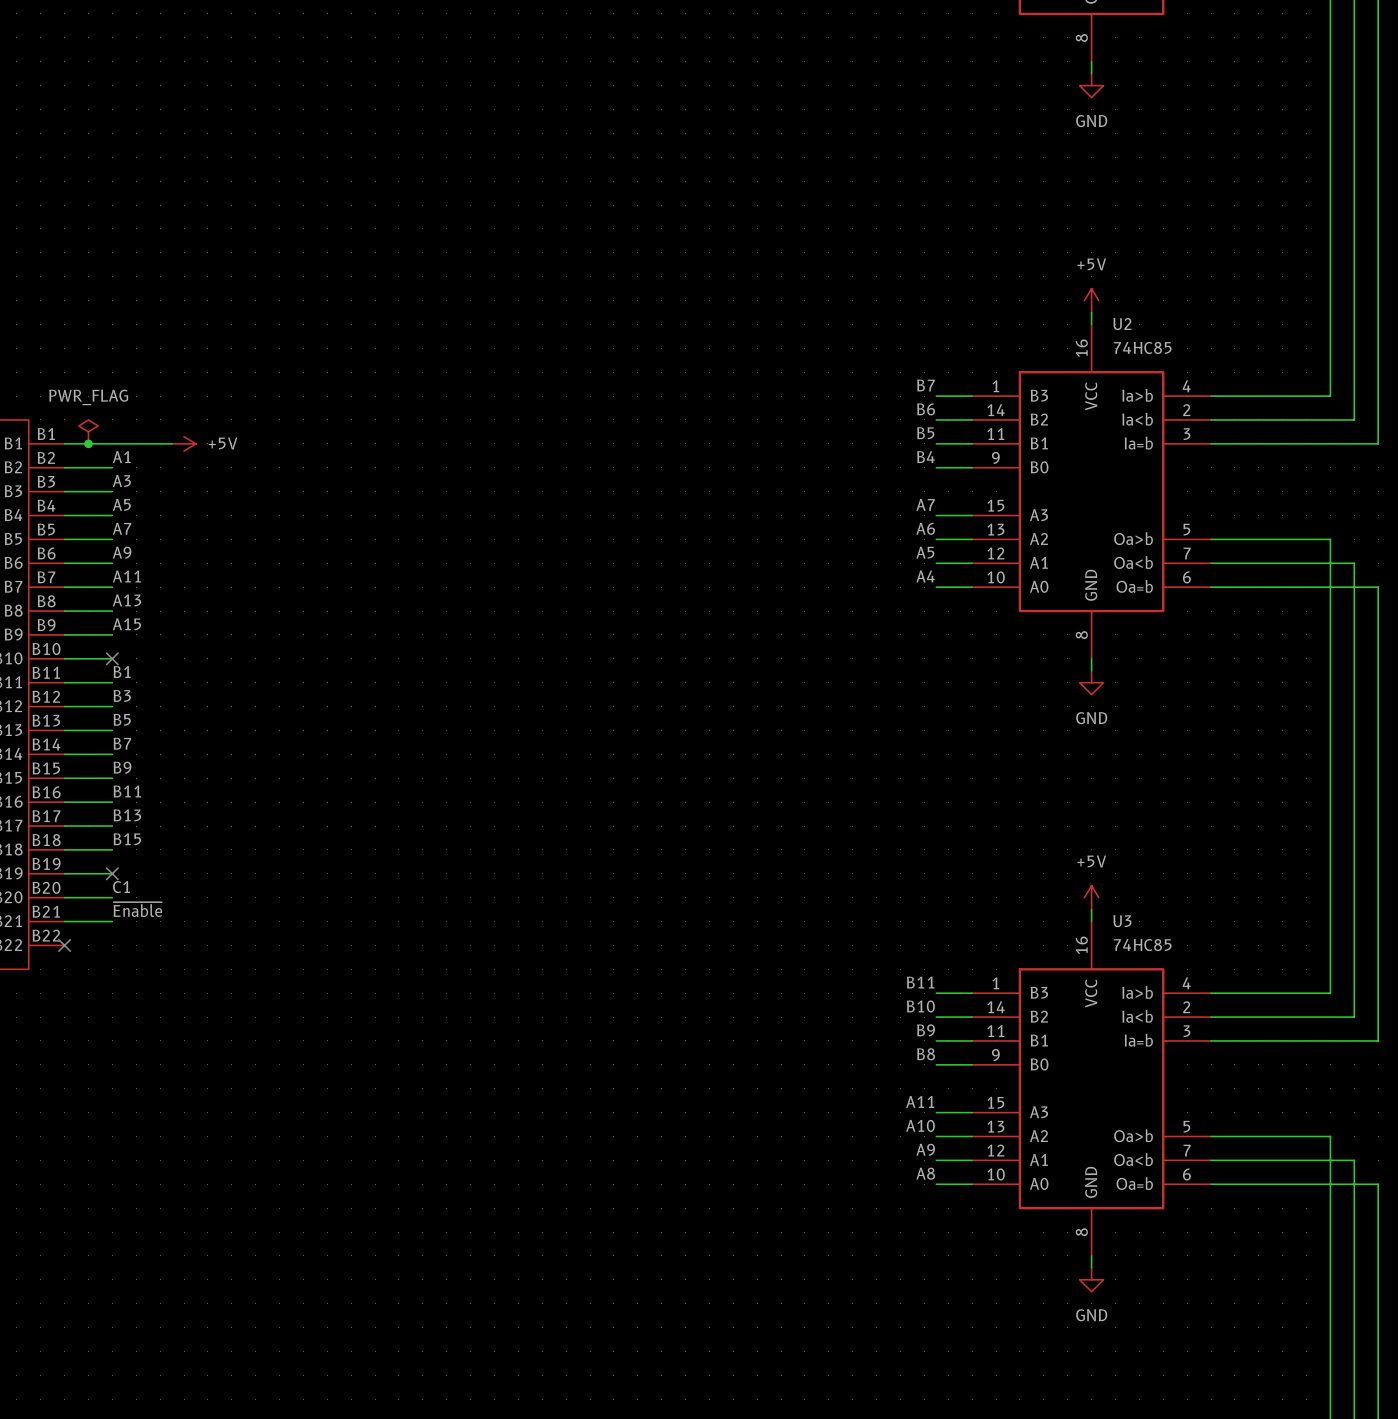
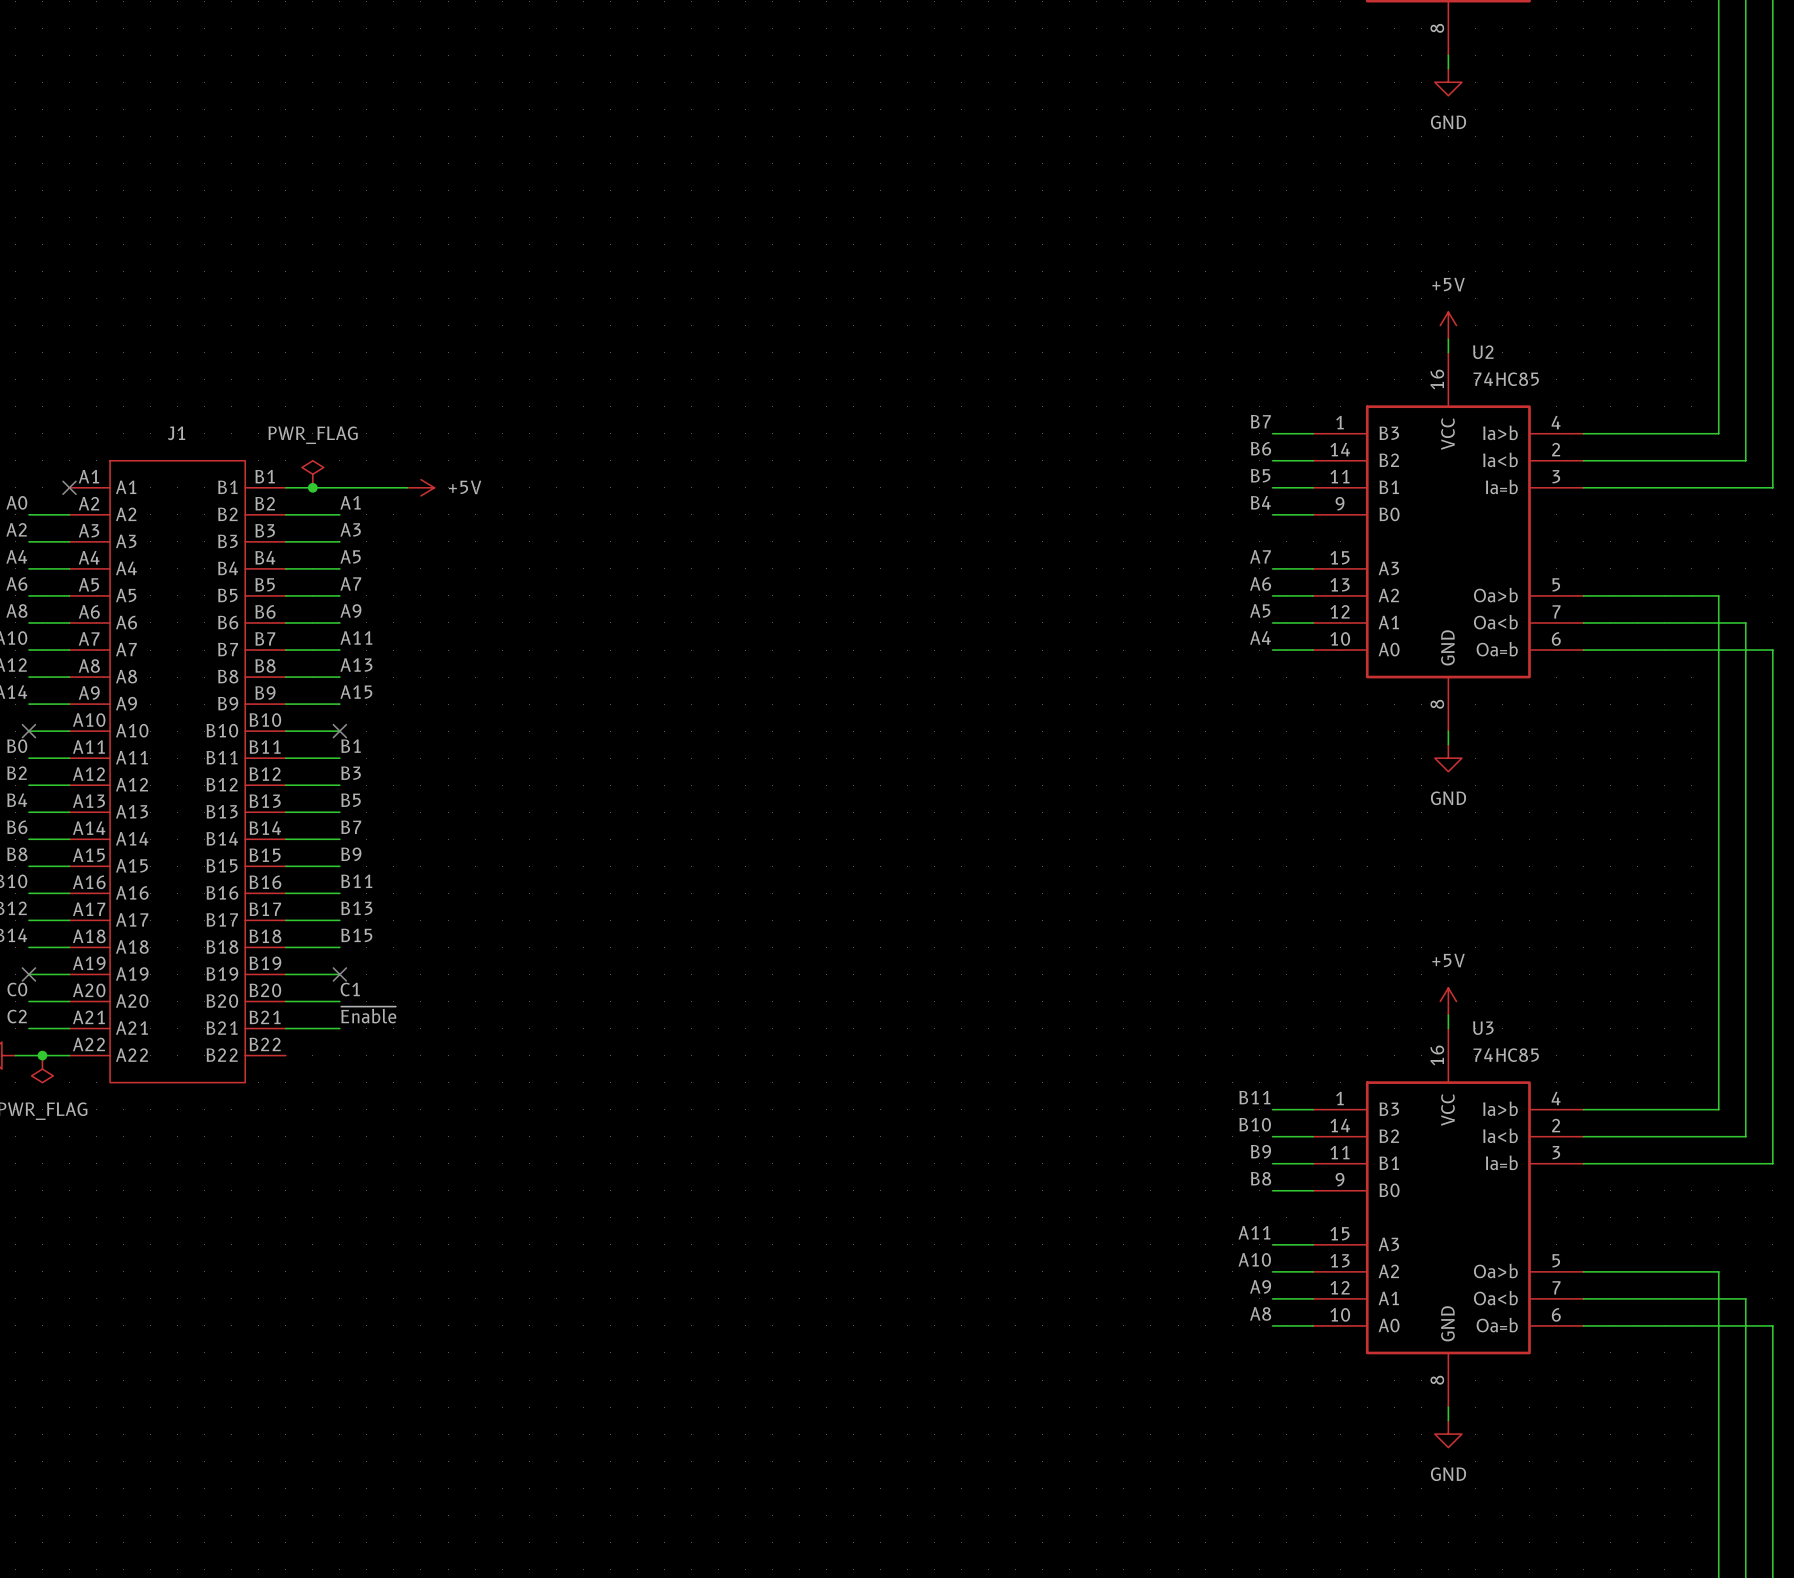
no-connect mark: (64, 945) -> none

